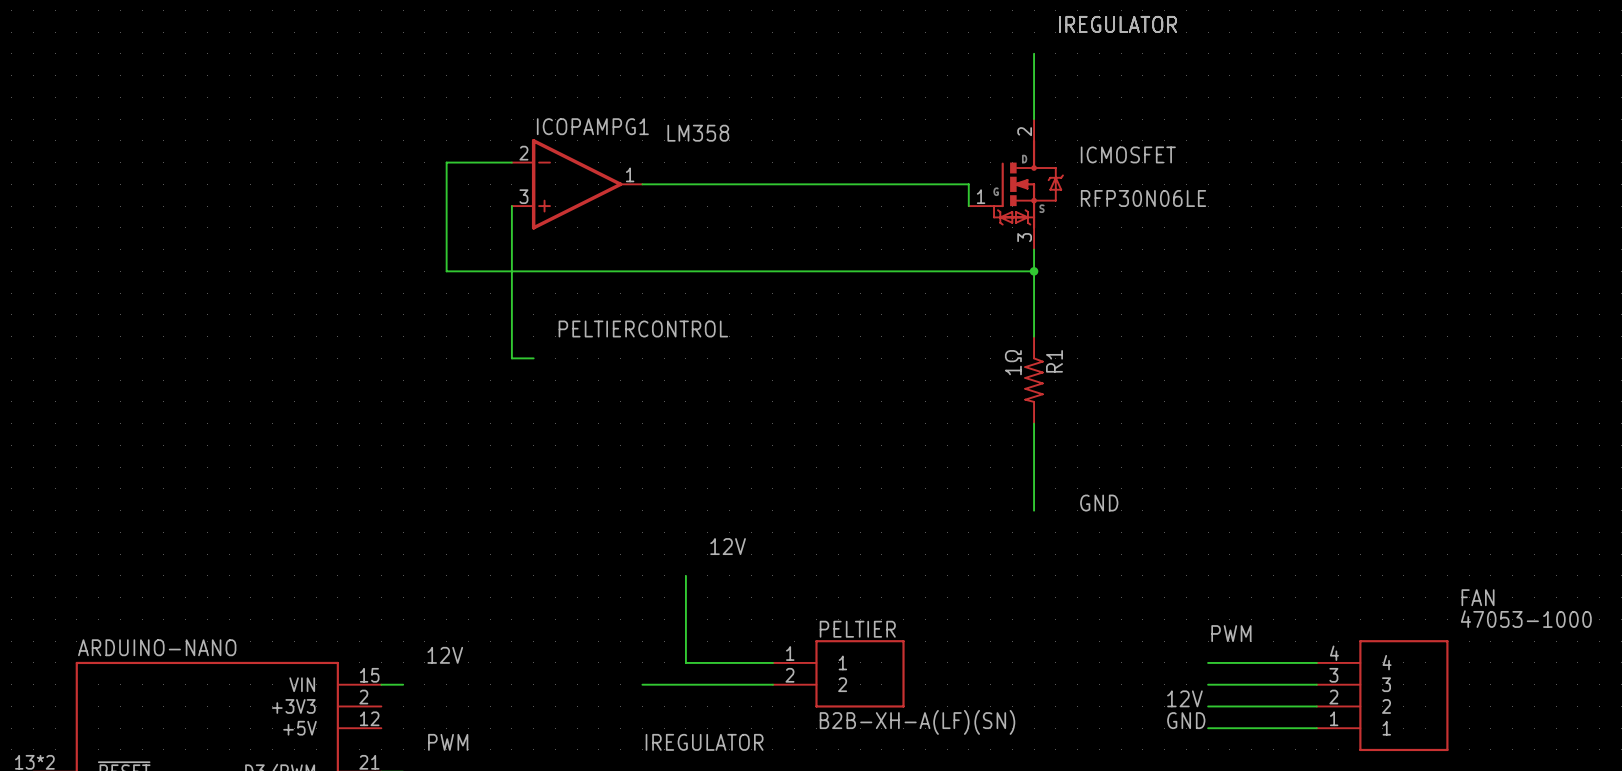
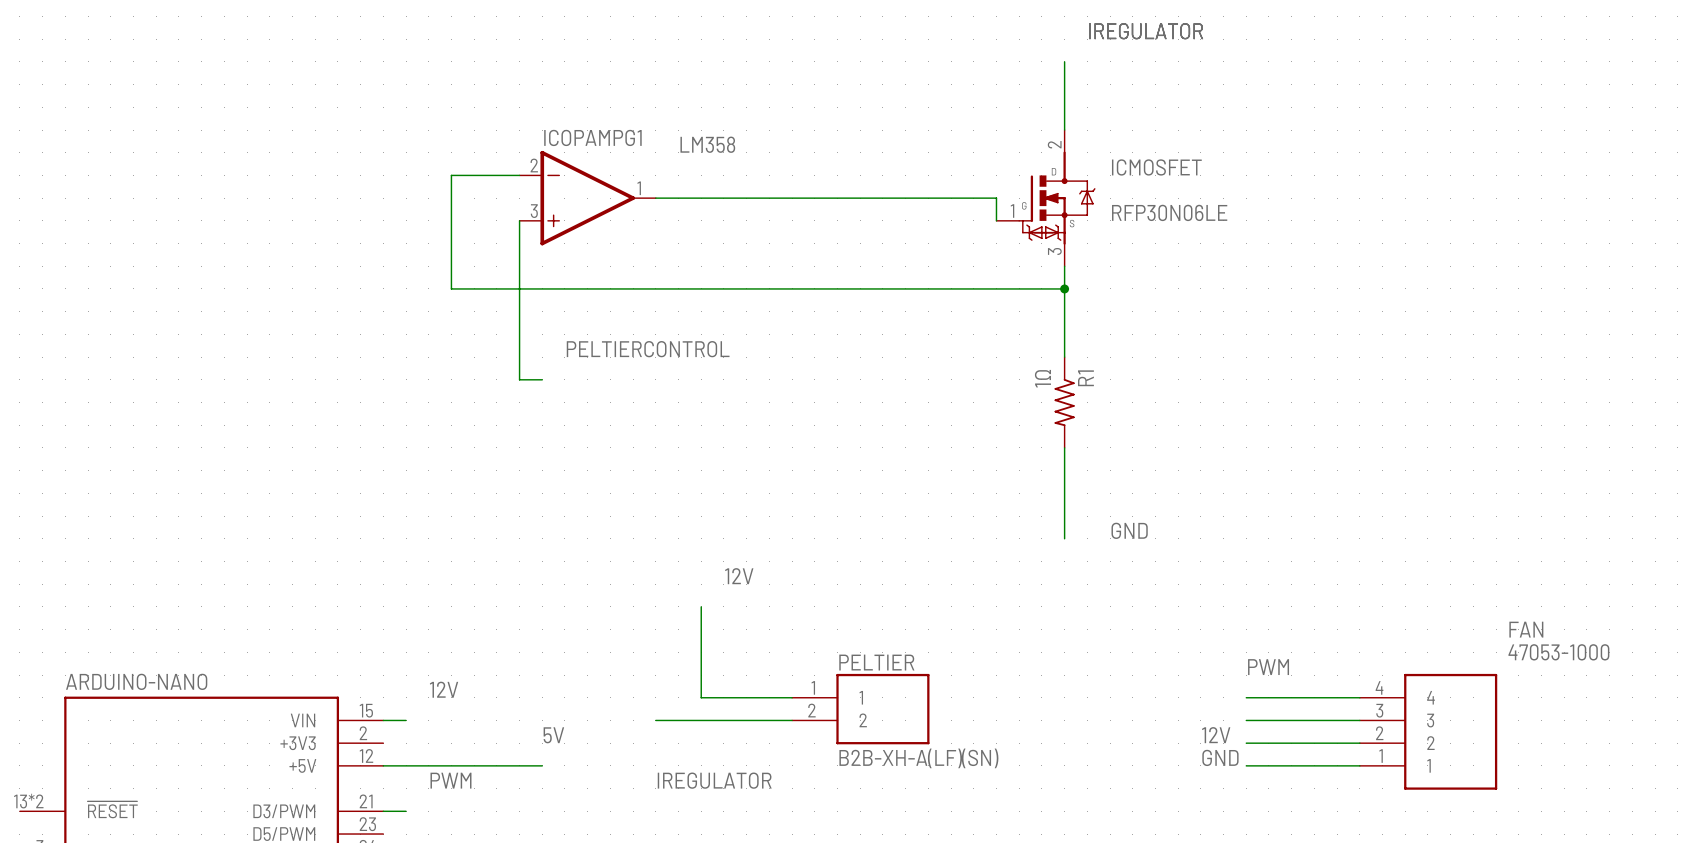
label: none -> 5V (553, 735)
wire: none -> (383, 765) (542, 765)

